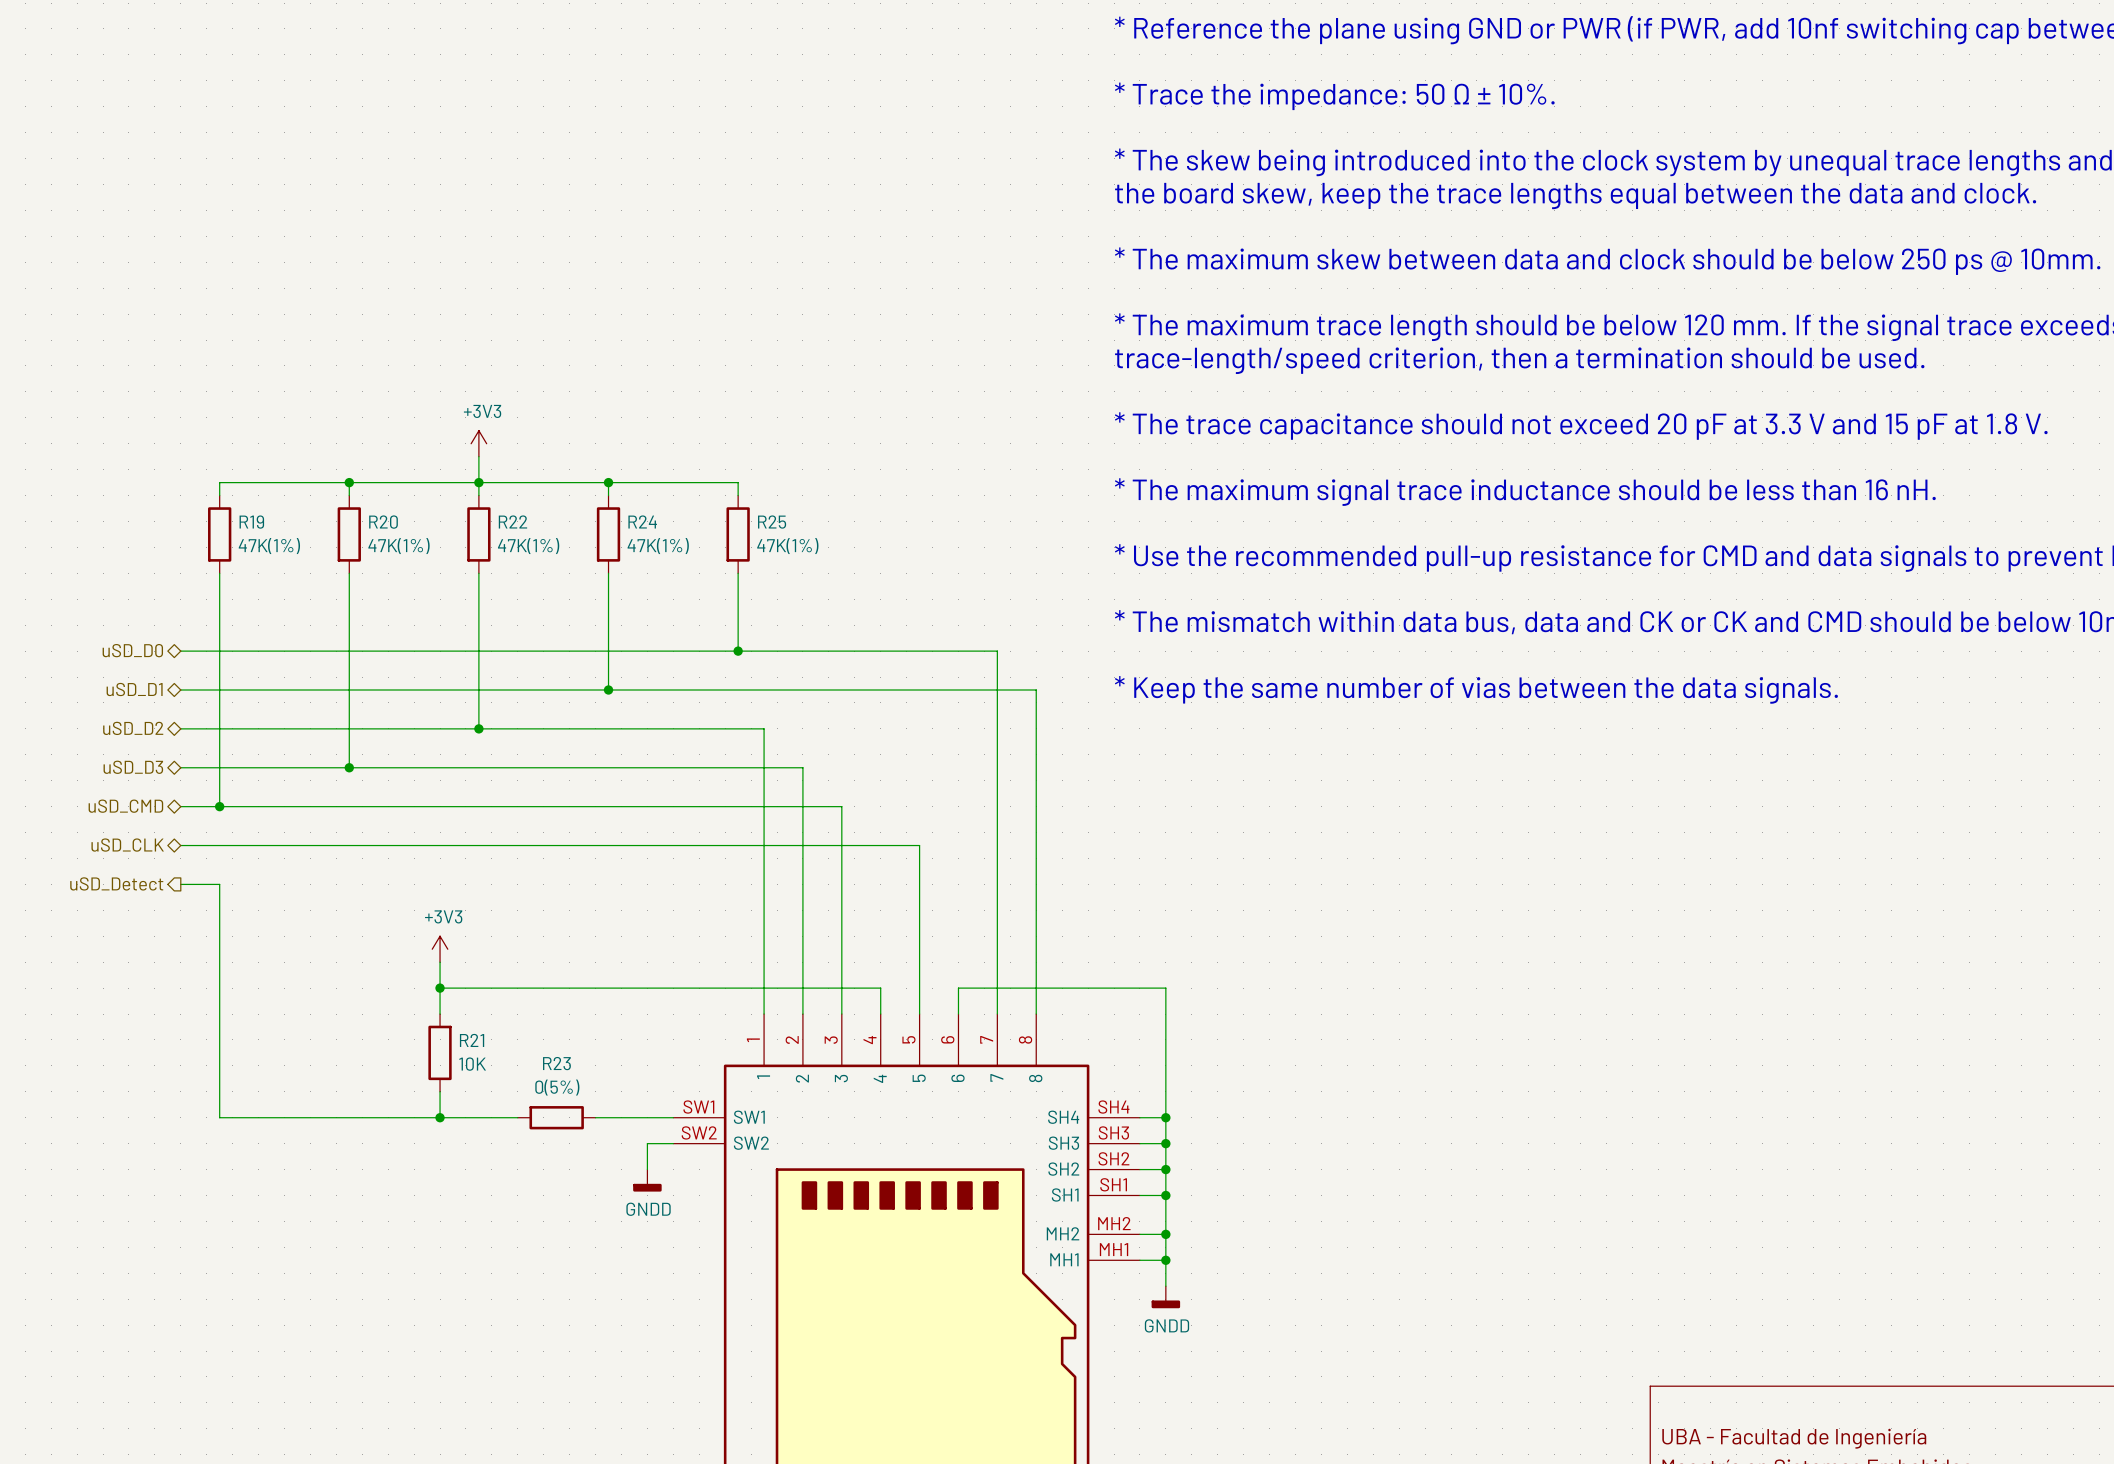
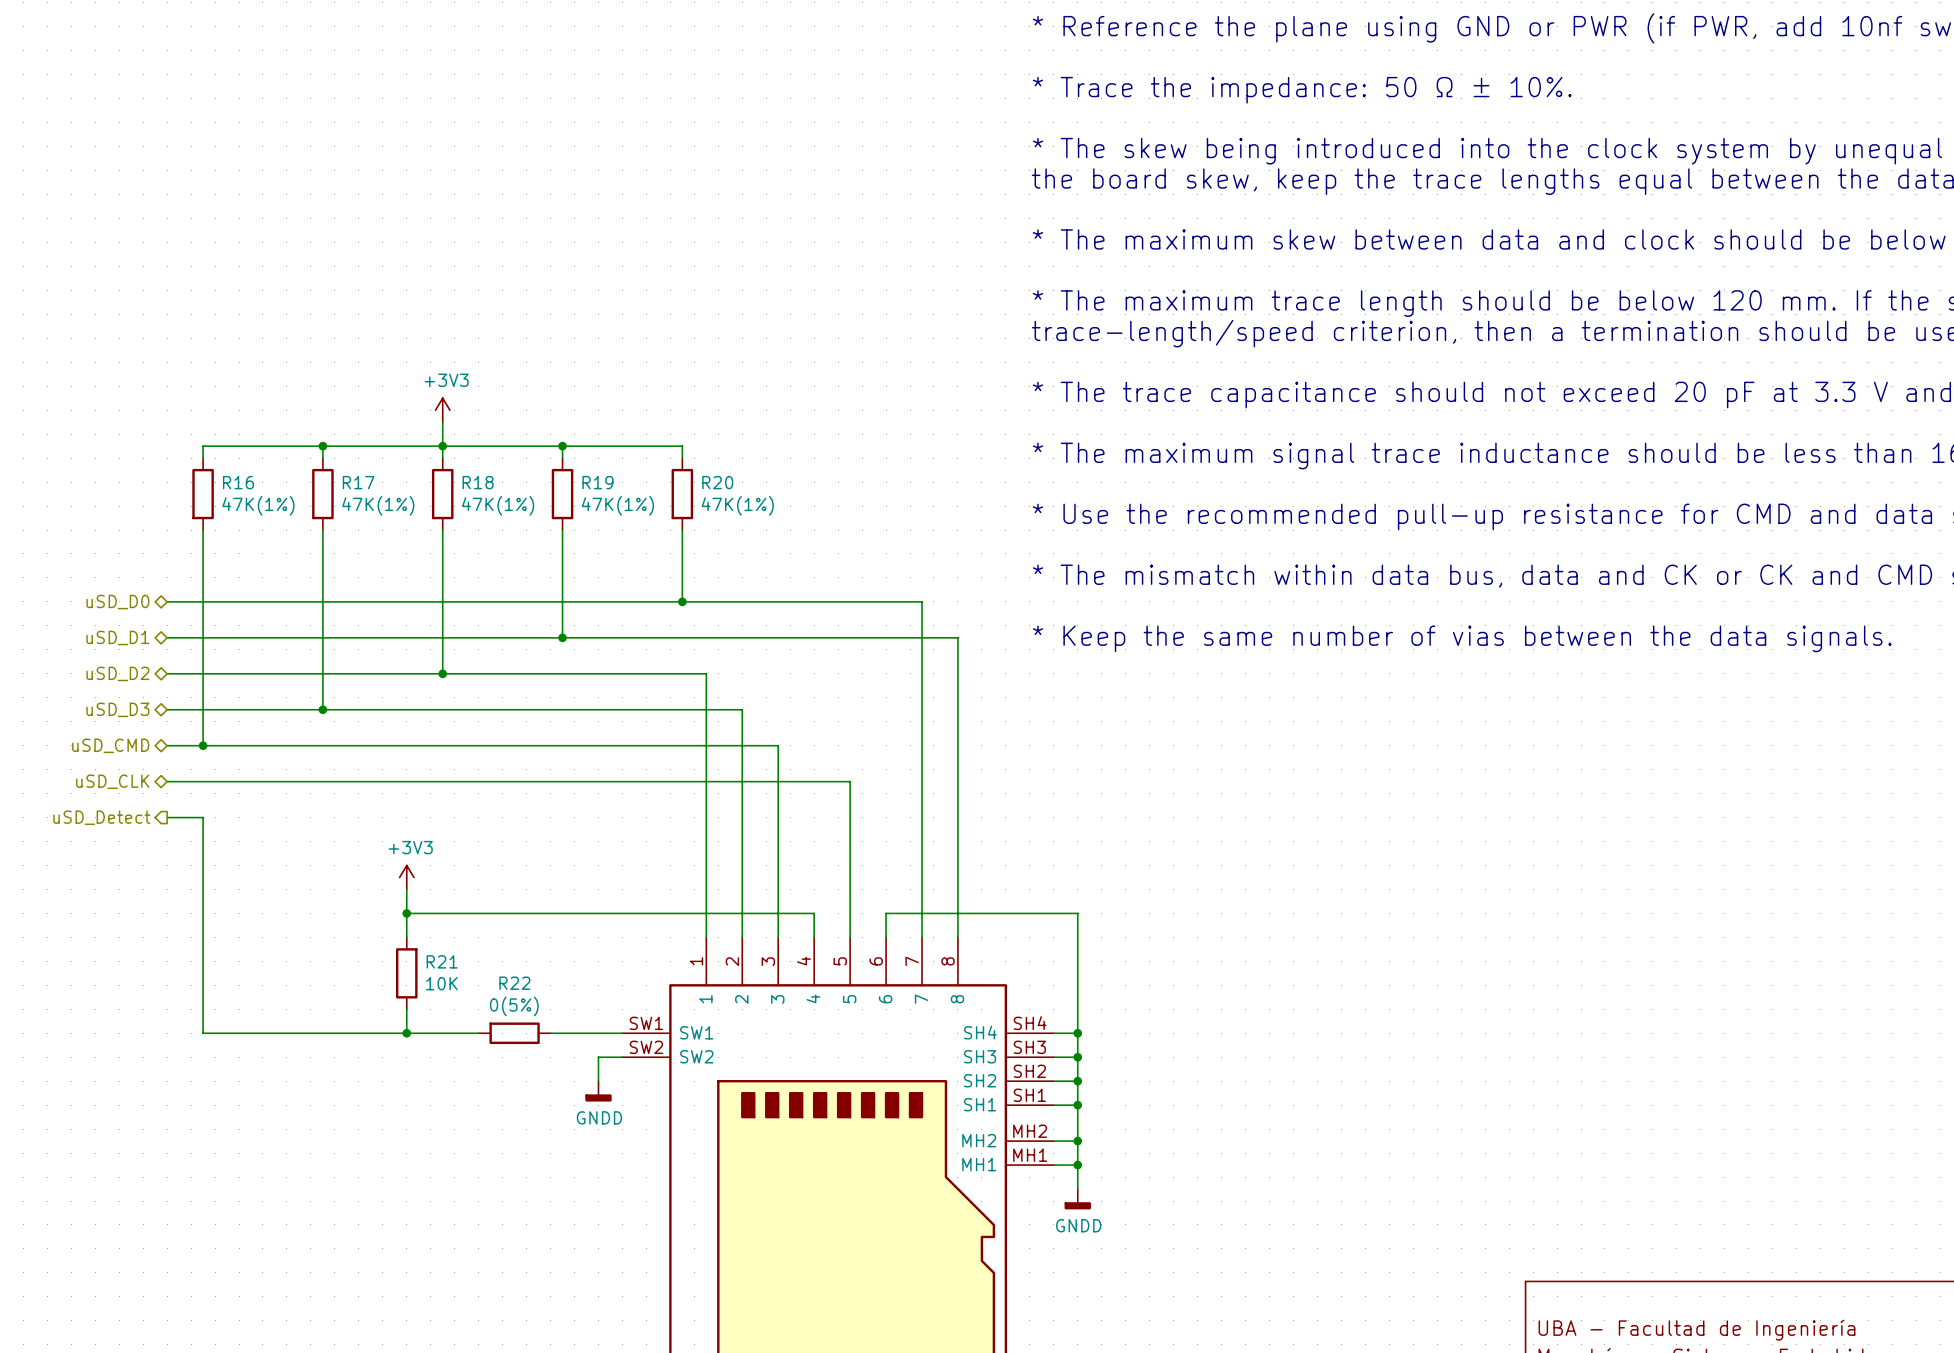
R22 name: R22 (512, 521) -> R18 (478, 482)
R24 name: R24 (642, 521) -> R19 (597, 482)
R19 name: R19 (251, 522) -> R16 (238, 482)
R20 name: R20 (383, 522) -> R17 (358, 482)
R25 name: R25 (772, 522) -> R20 (717, 482)
R23 name: R23 (556, 1063) -> R22 (514, 983)

